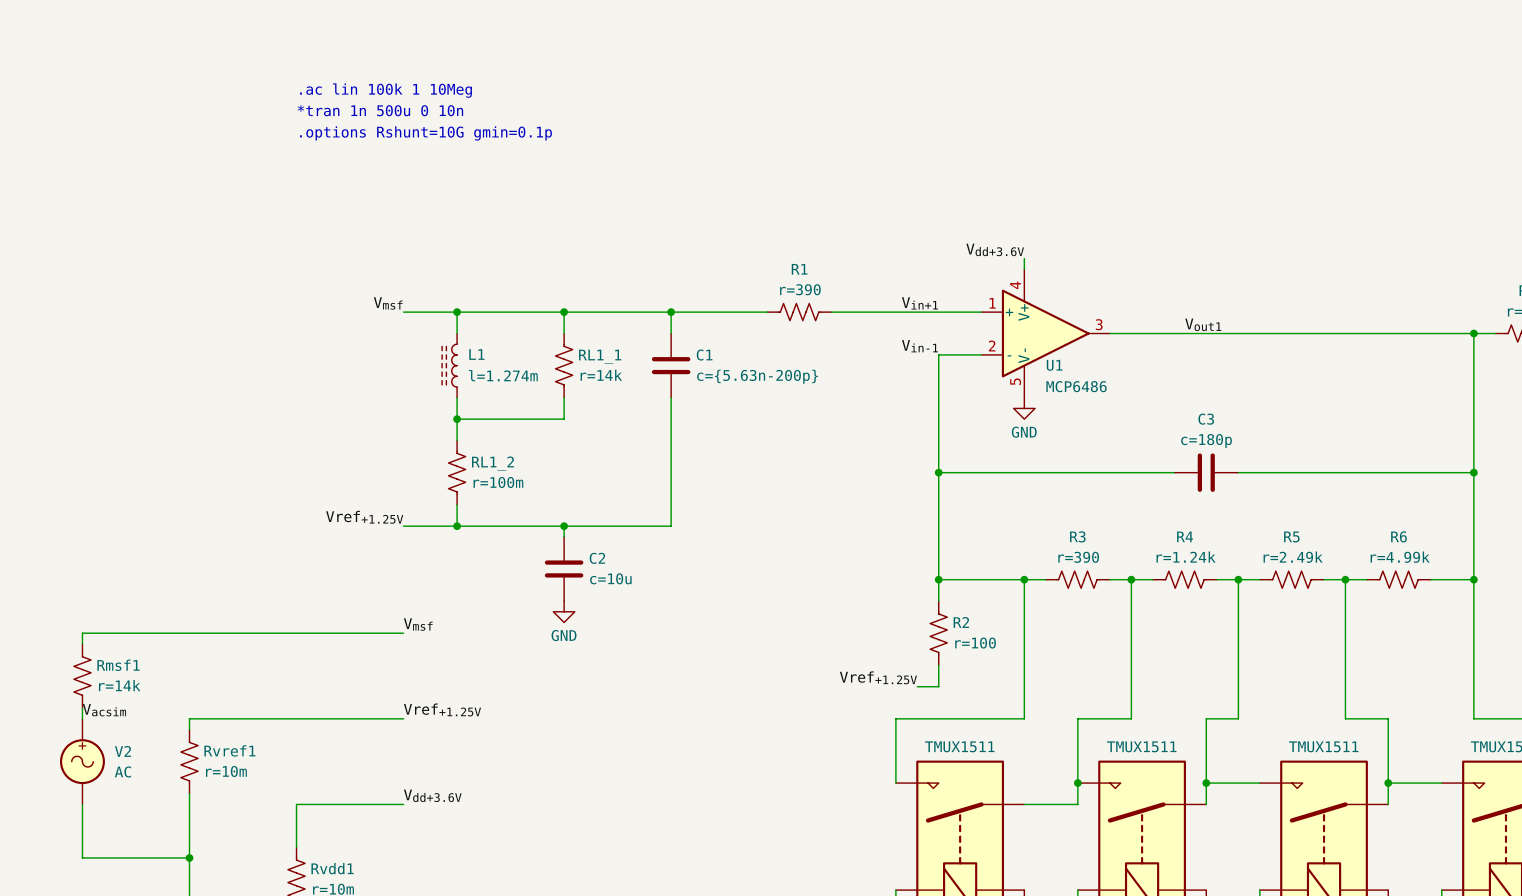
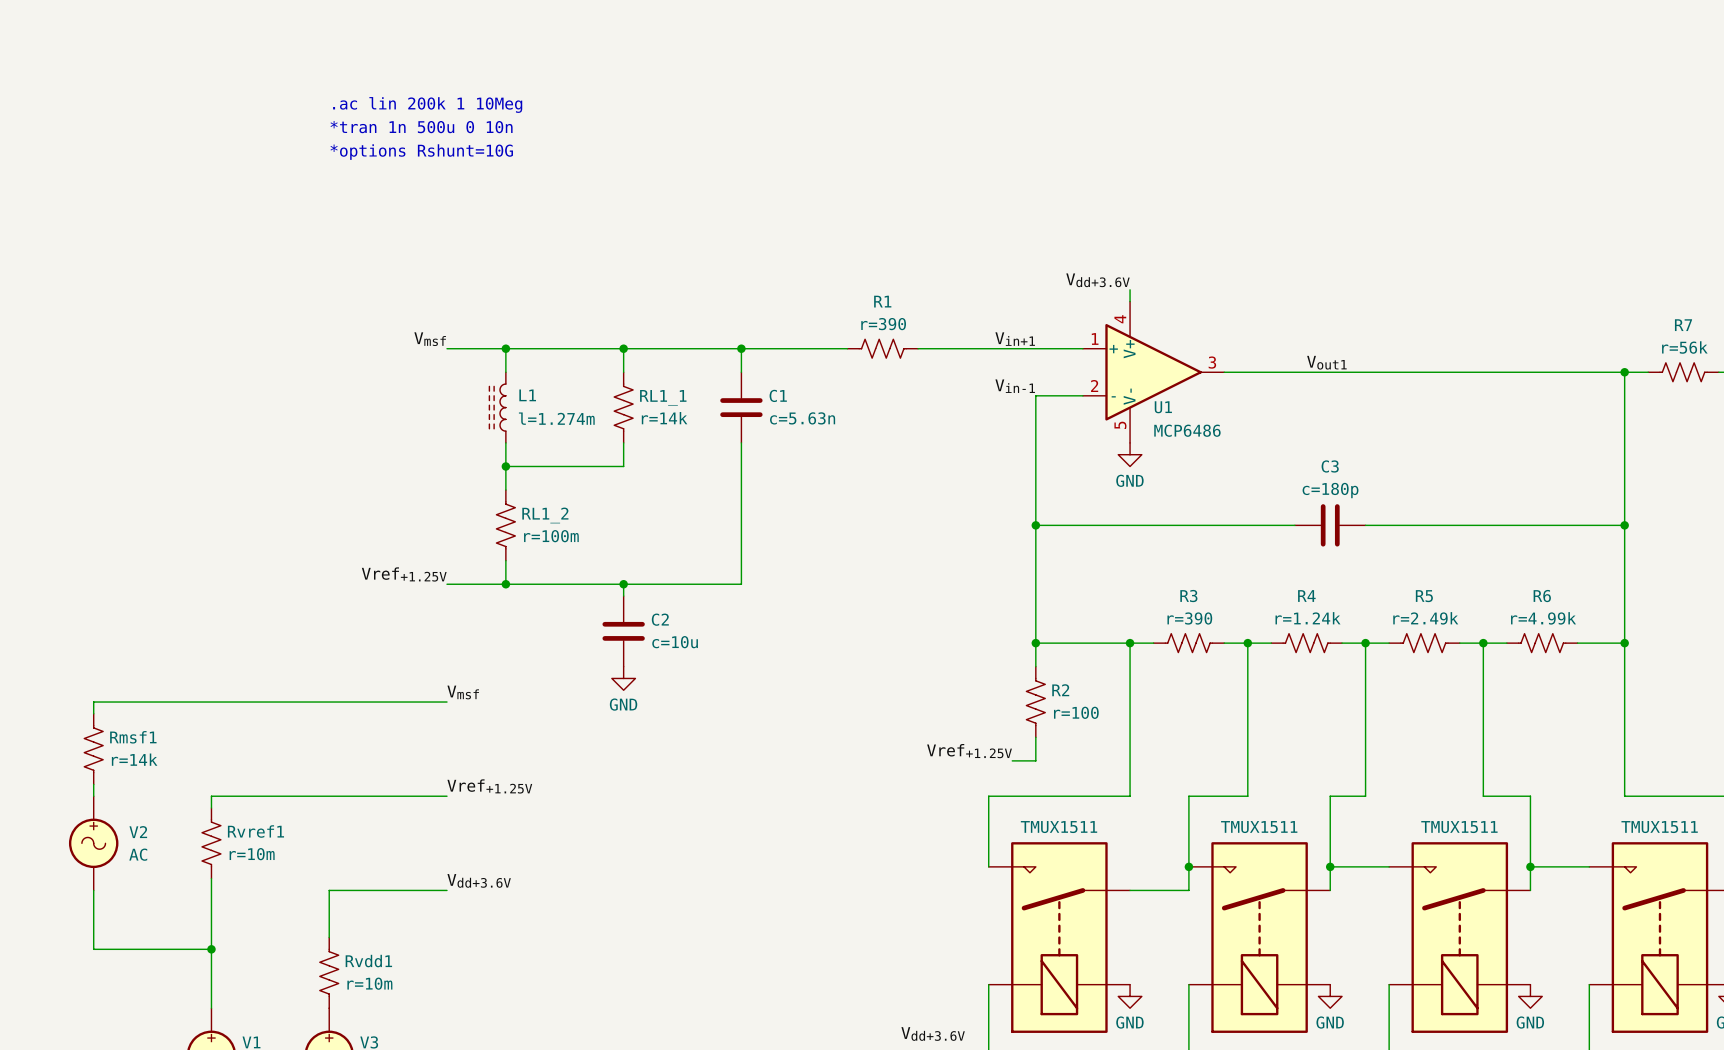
text: .ac lin 100k 1 10Meg (385, 90) -> .ac lin 200k 1 10Meg (427, 104)
text: .options Rshunt=10G gmin=0.1p (425, 133) -> *options Rshunt=10G (421, 152)
C1 value: c={5.63n-200p} (757, 376) -> c=5.63n (802, 418)
label: Vacsim (104, 710) -> none

